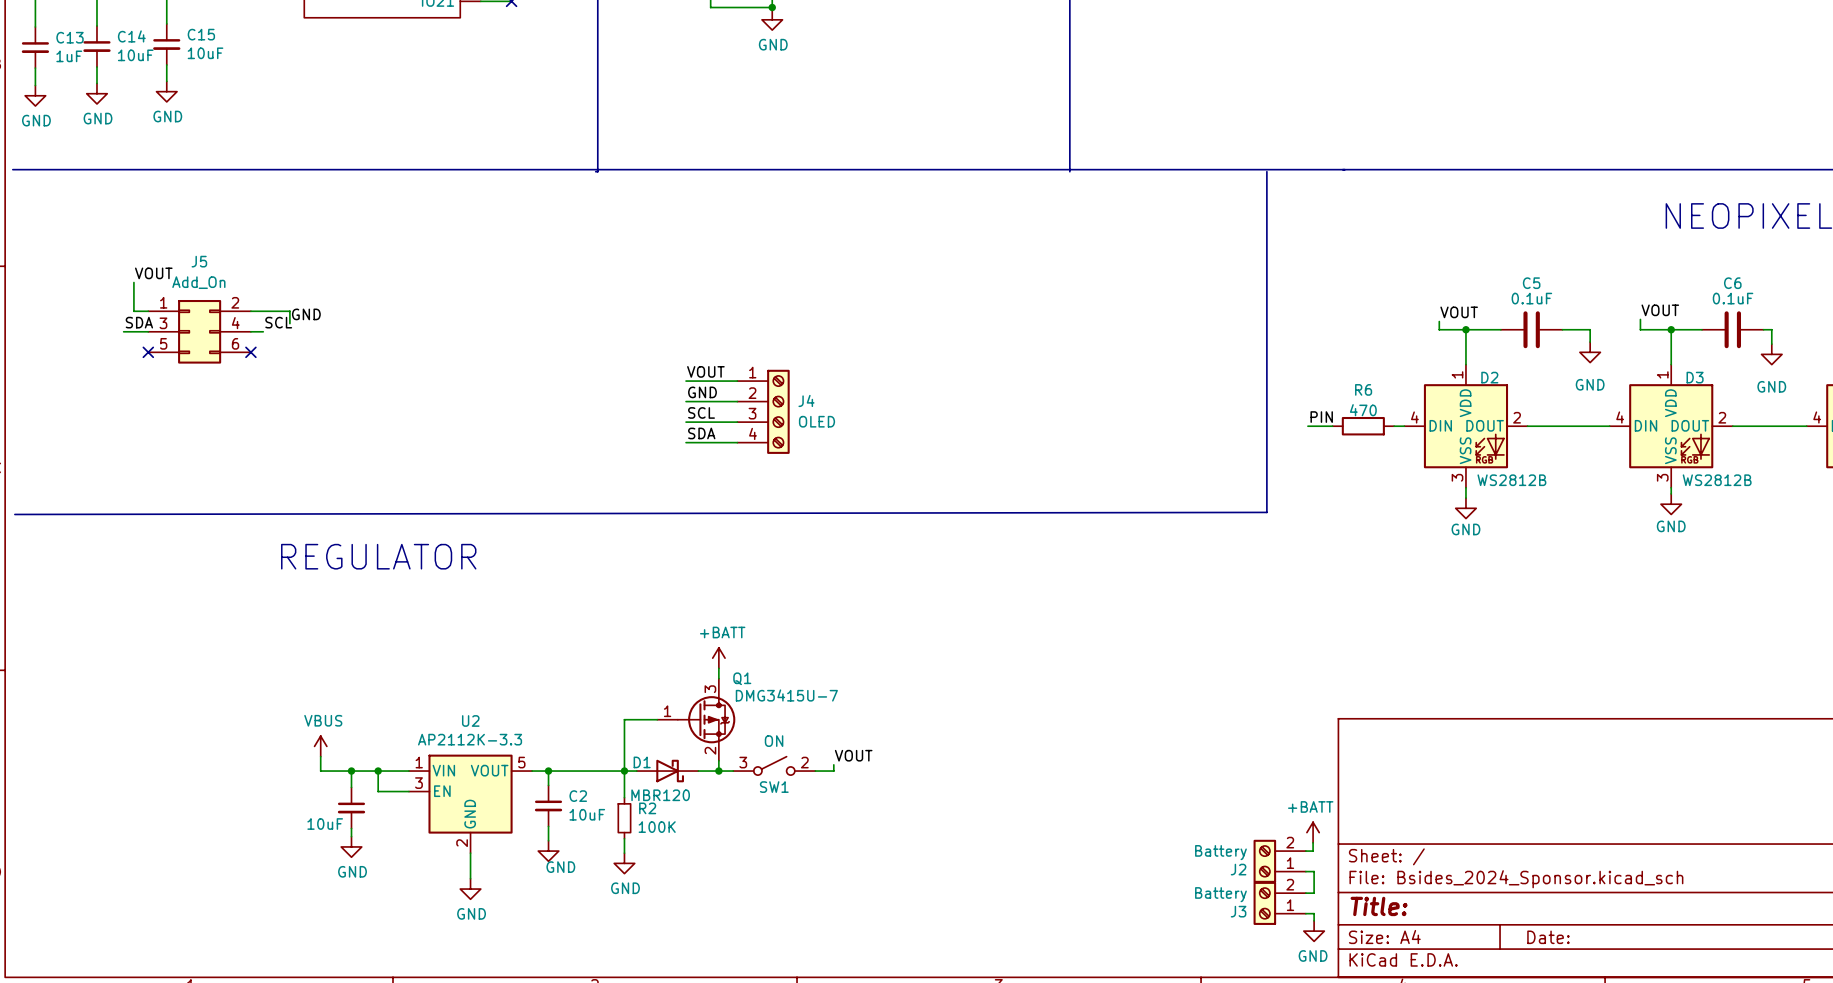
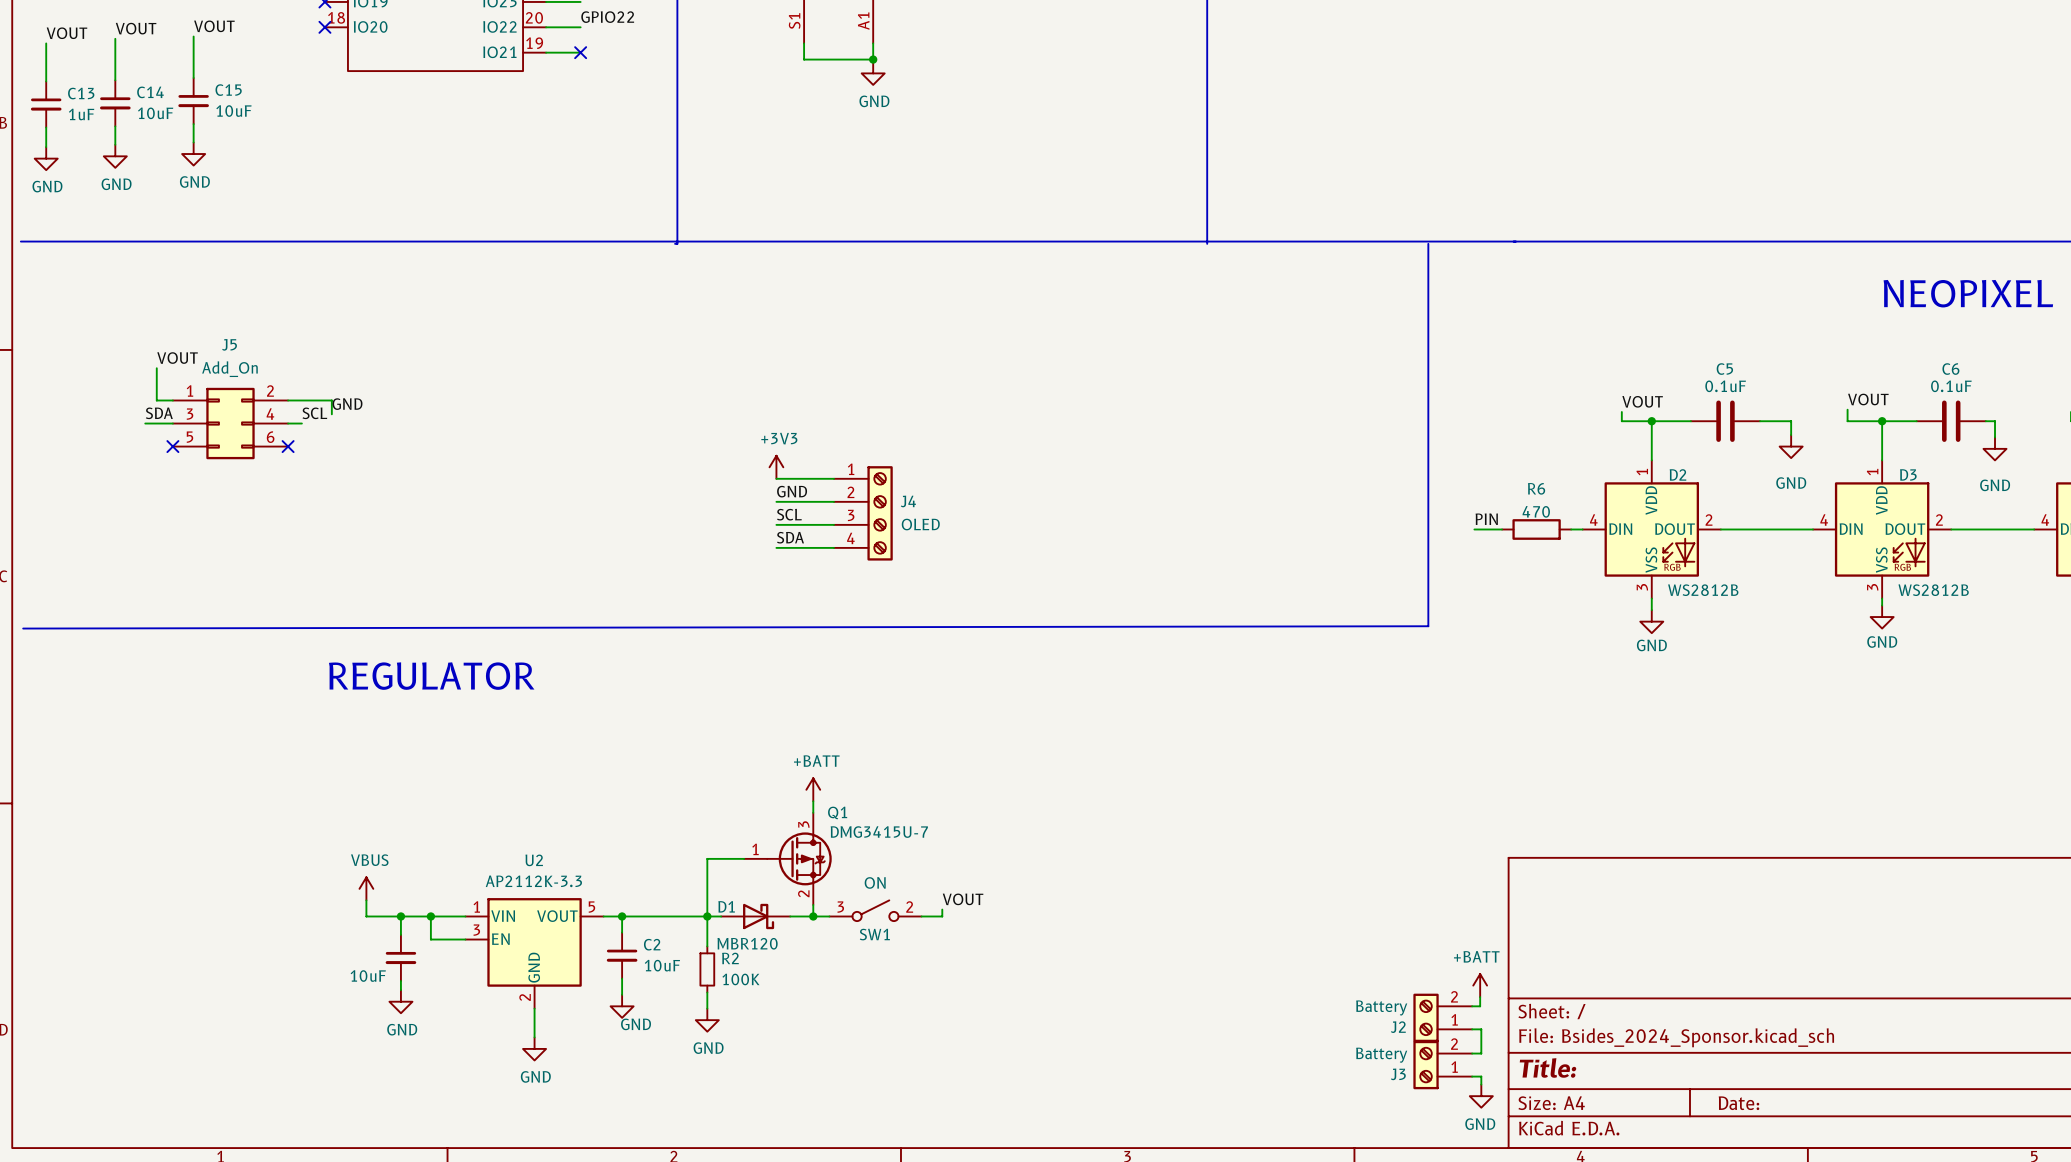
power symbol: none -> +3V3 (776, 467)
label: VOUT (705, 371) -> none

